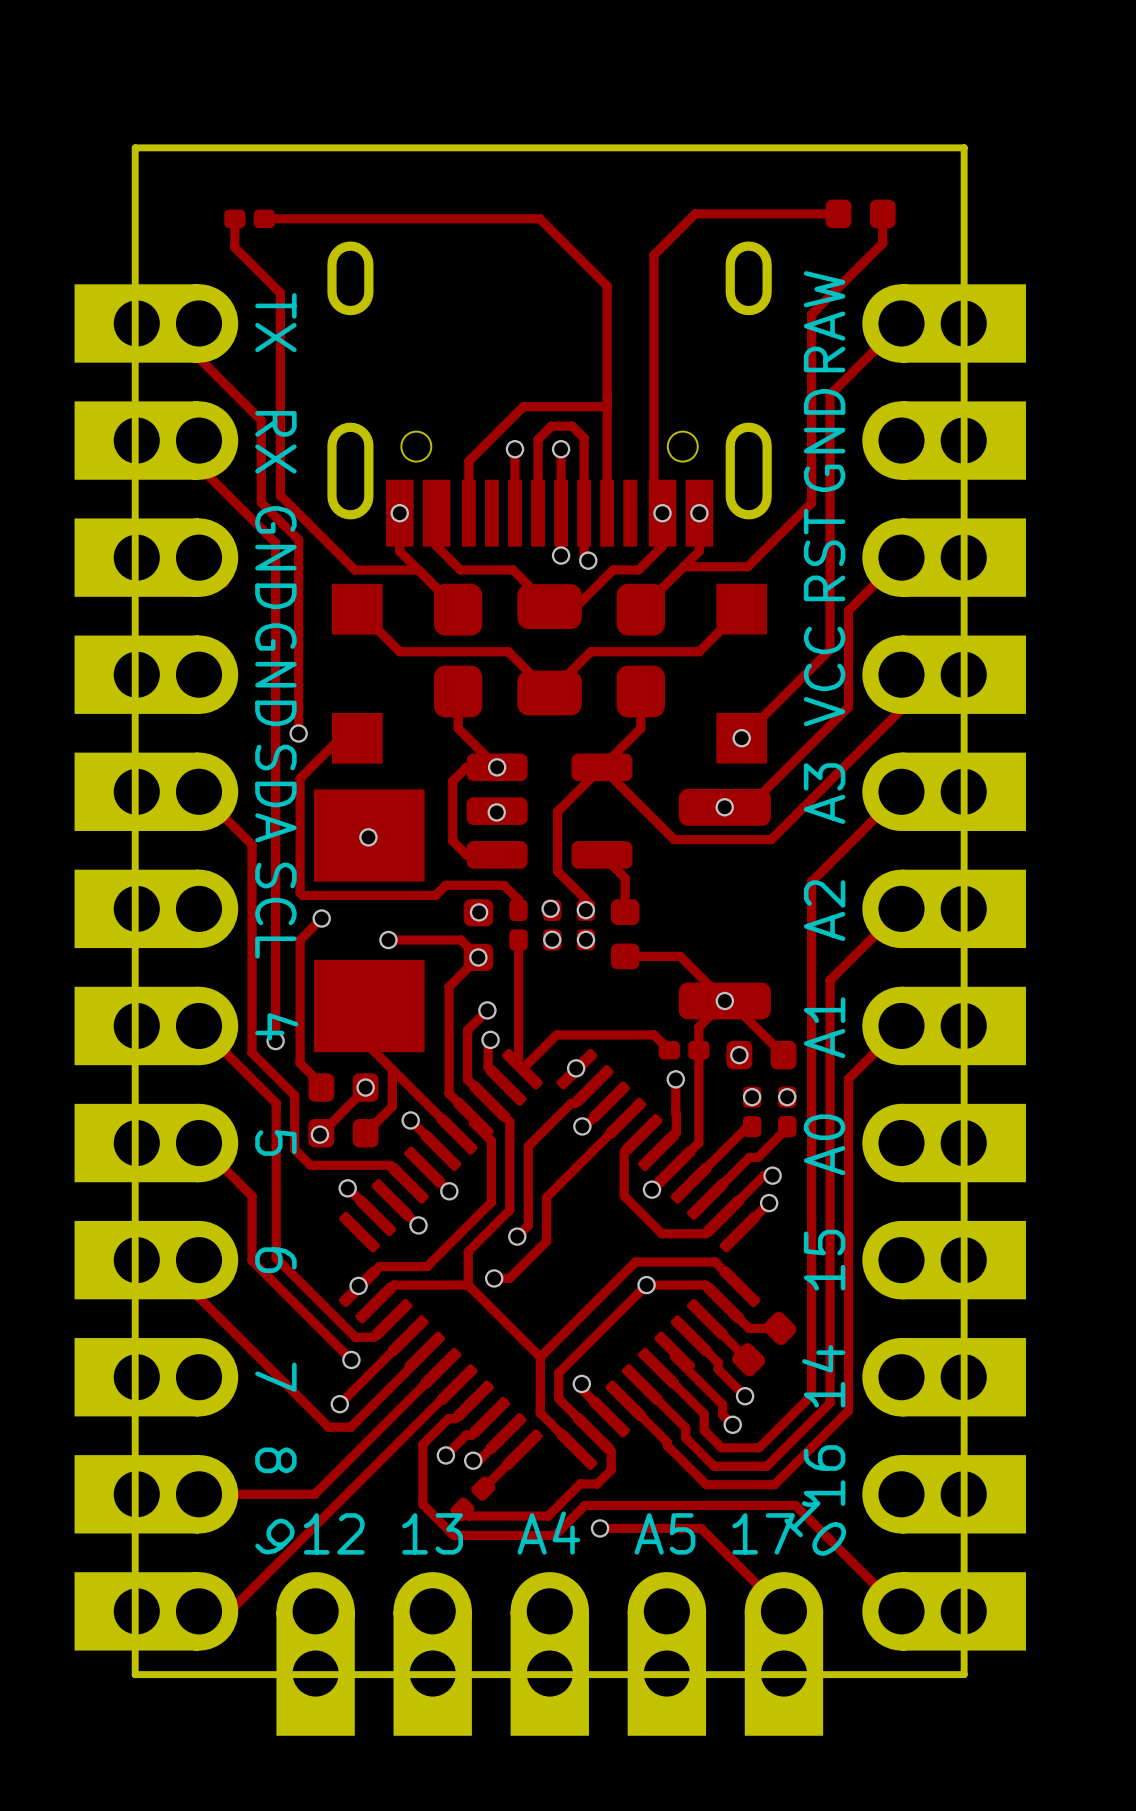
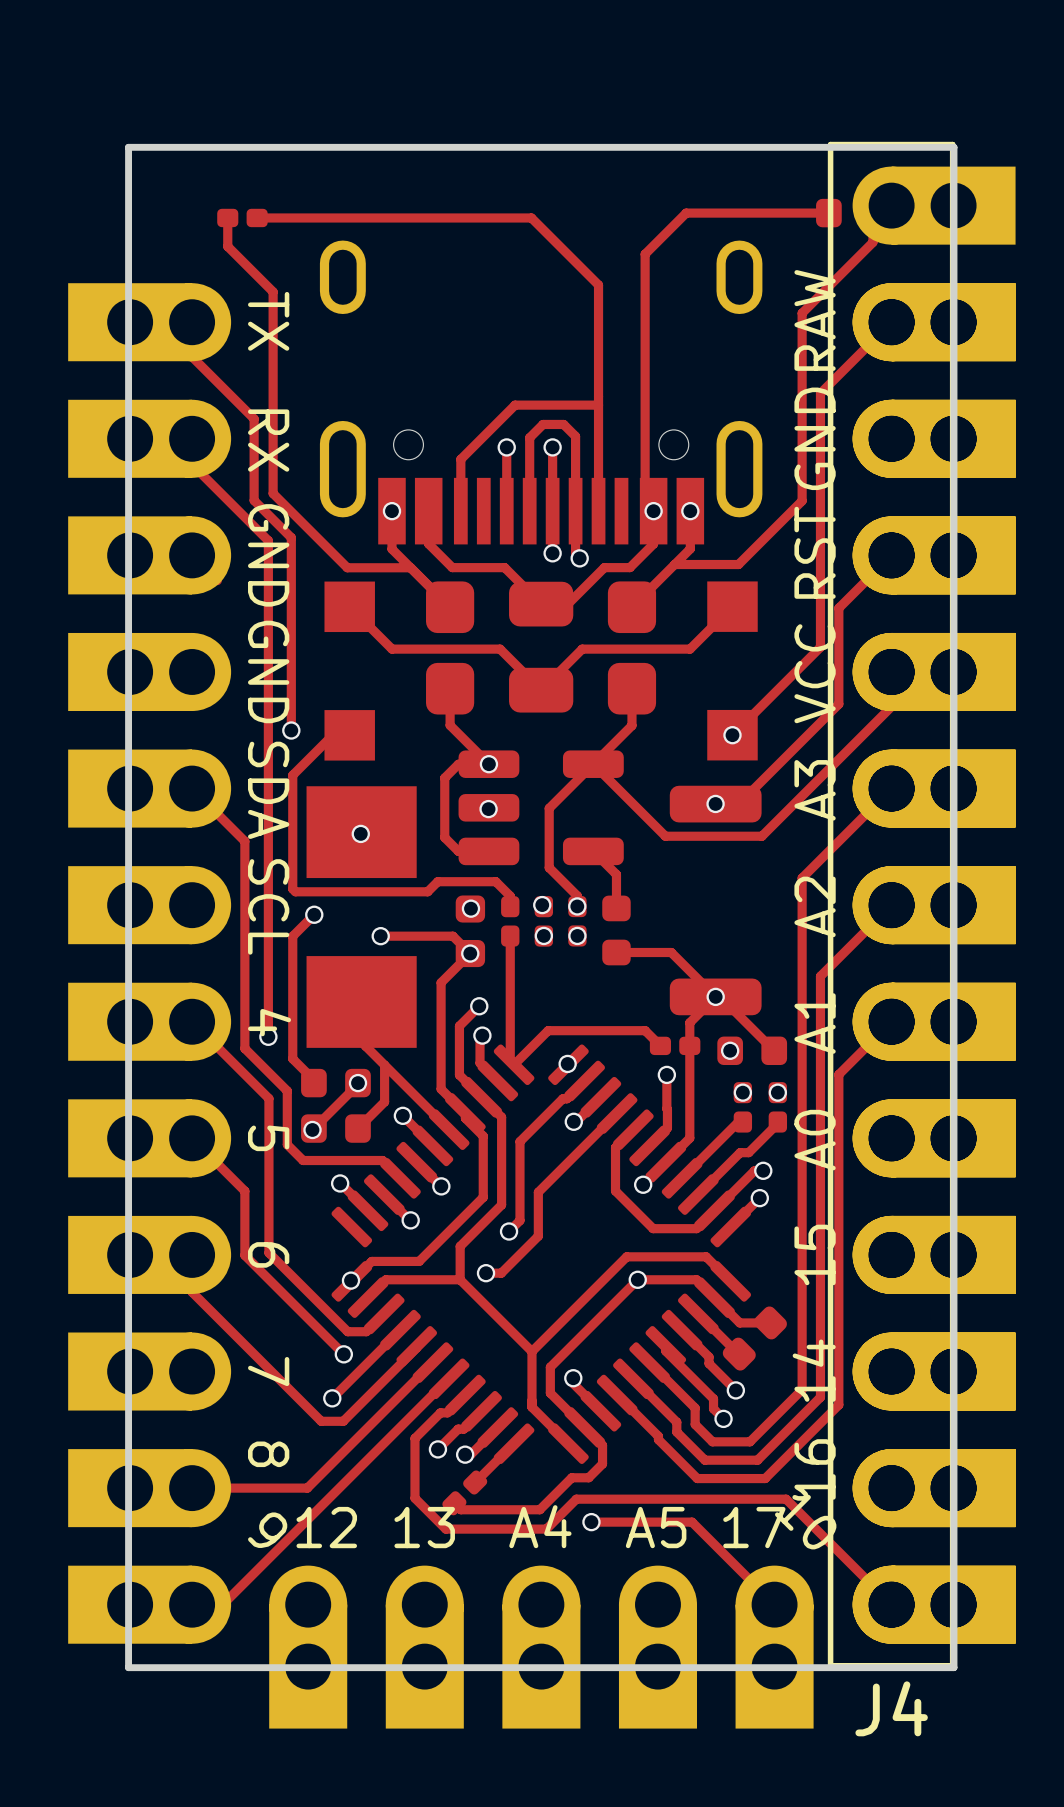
J4: none -> (921, 905)

